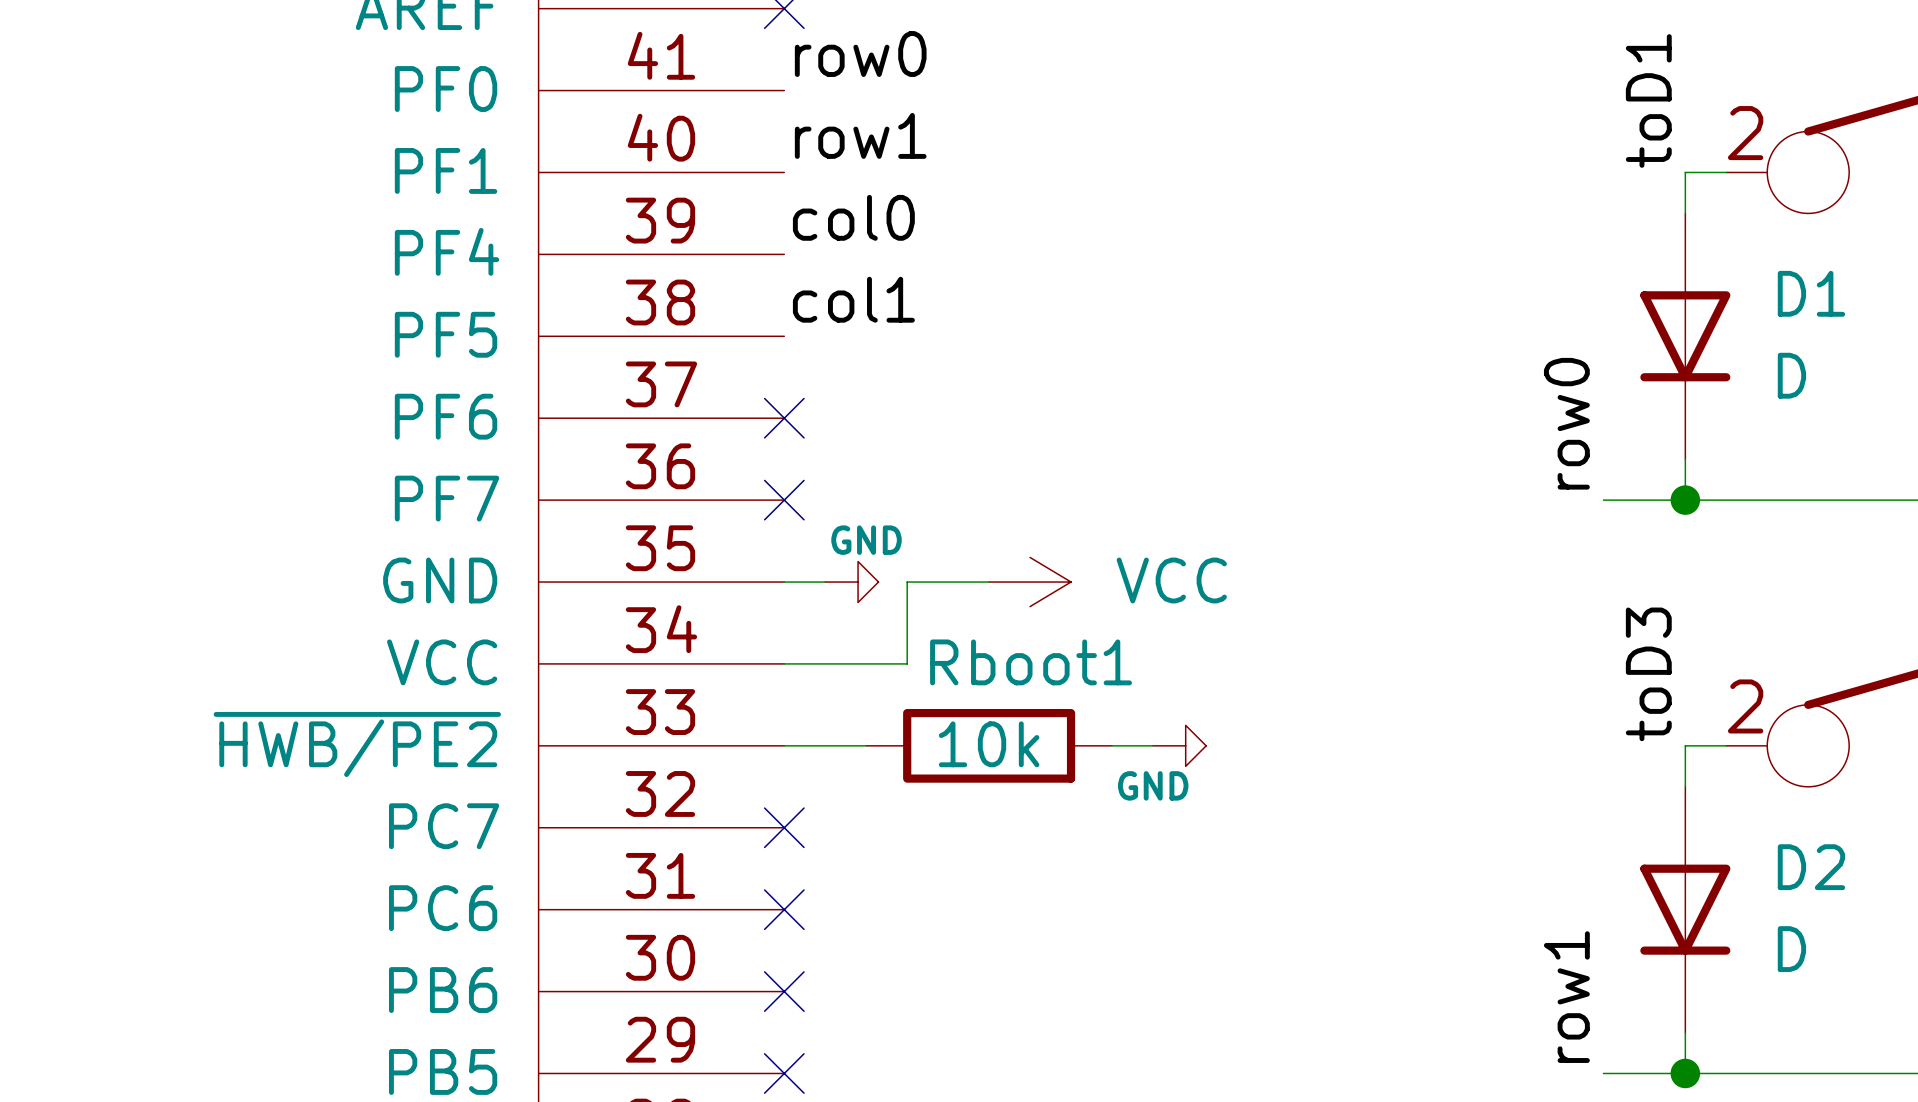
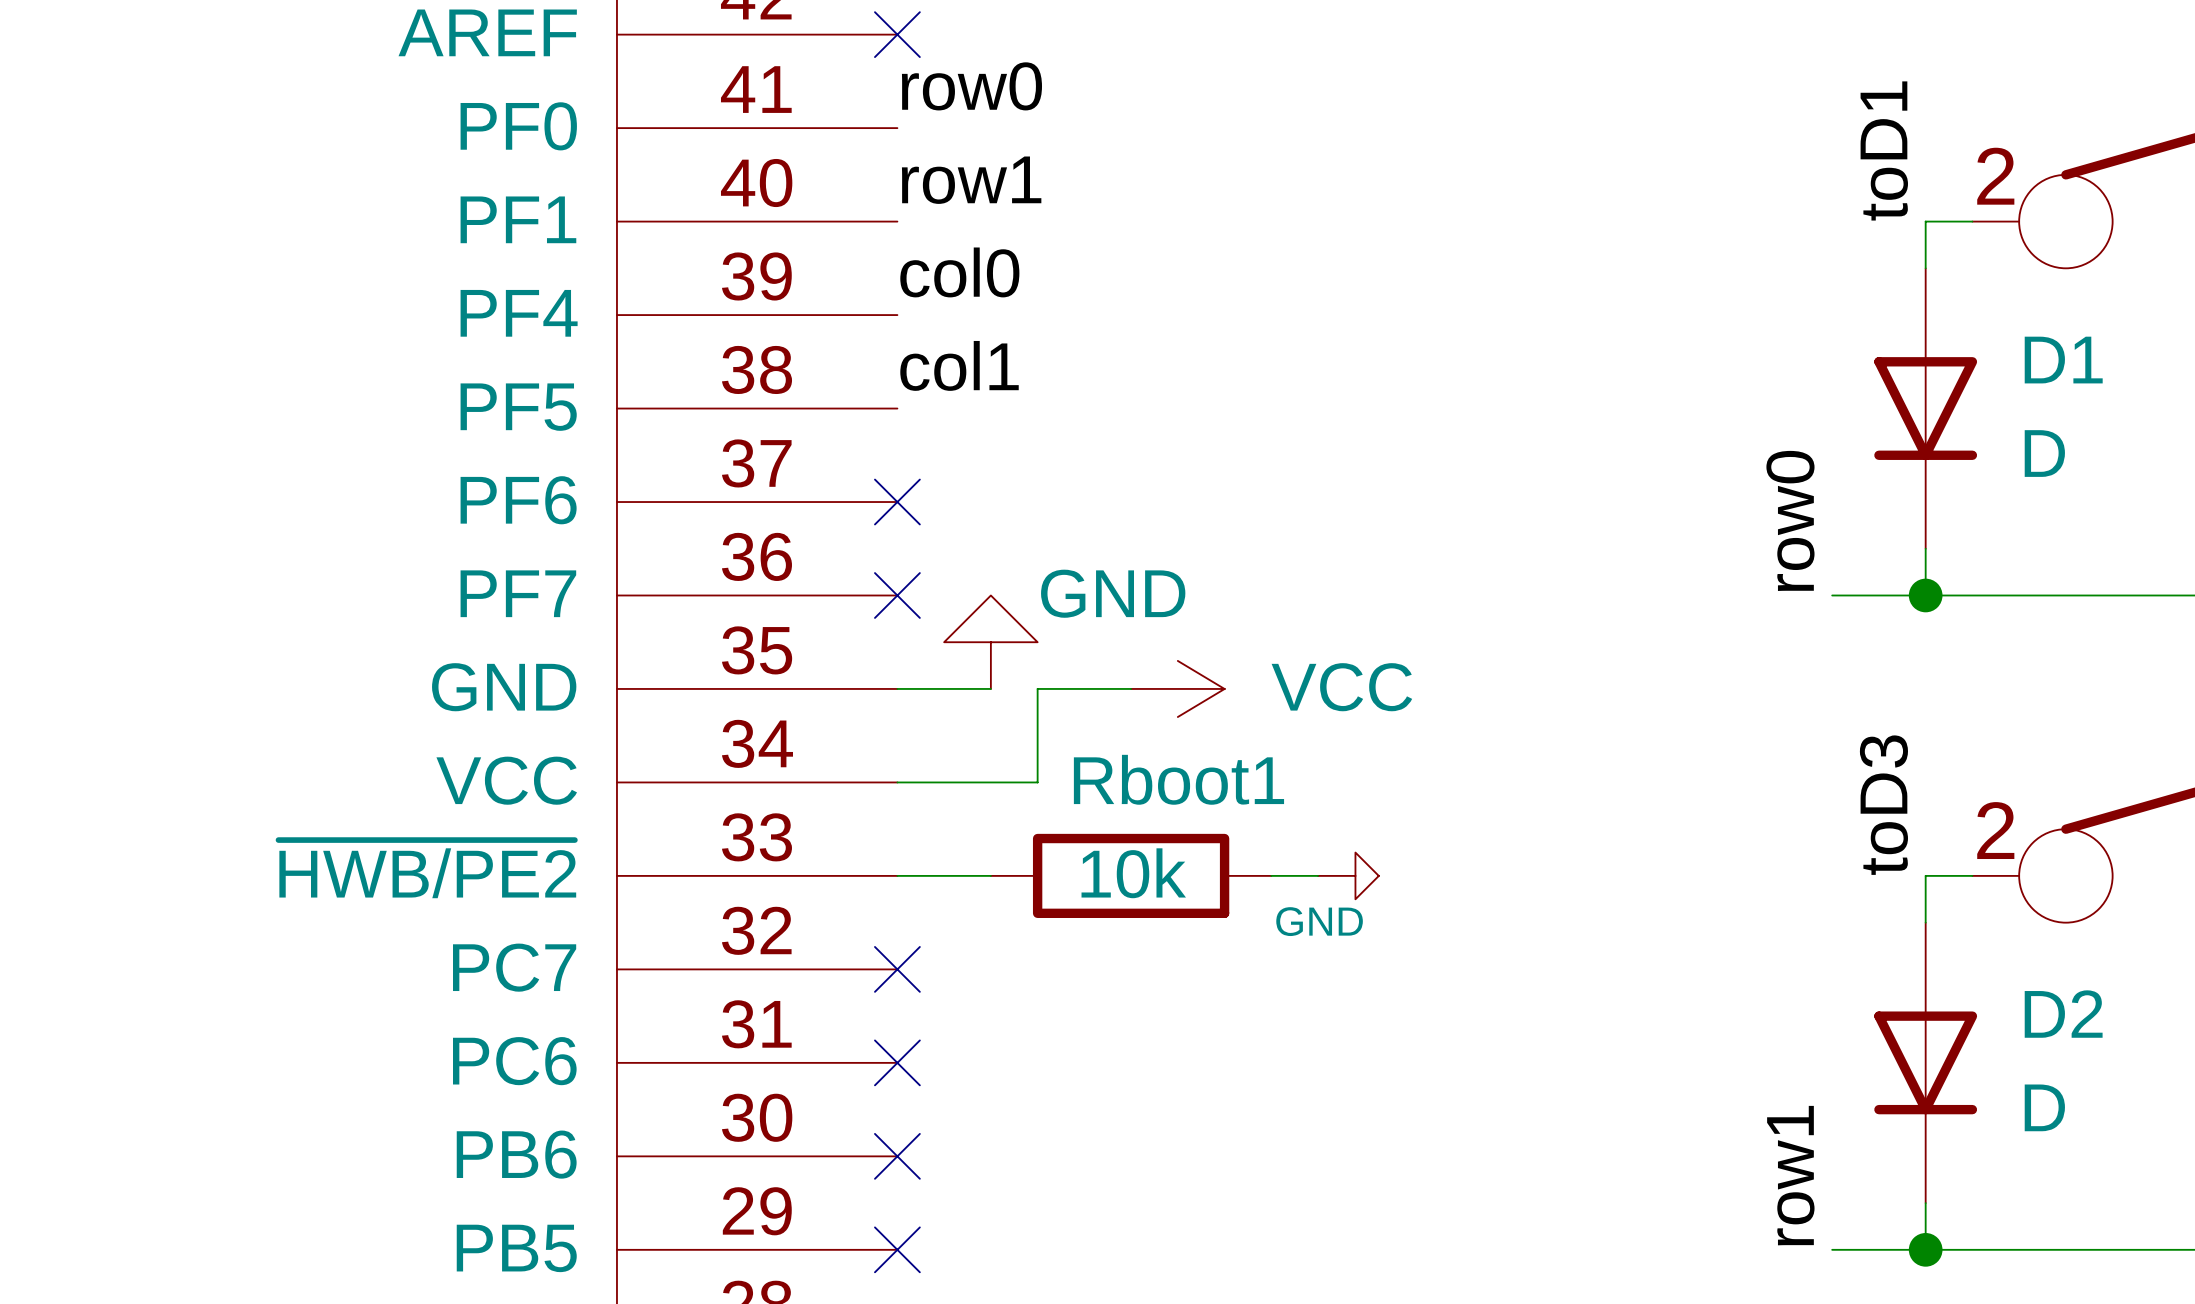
power symbol: none -> GND (990, 642)
power symbol: GND (851, 582) -> none

